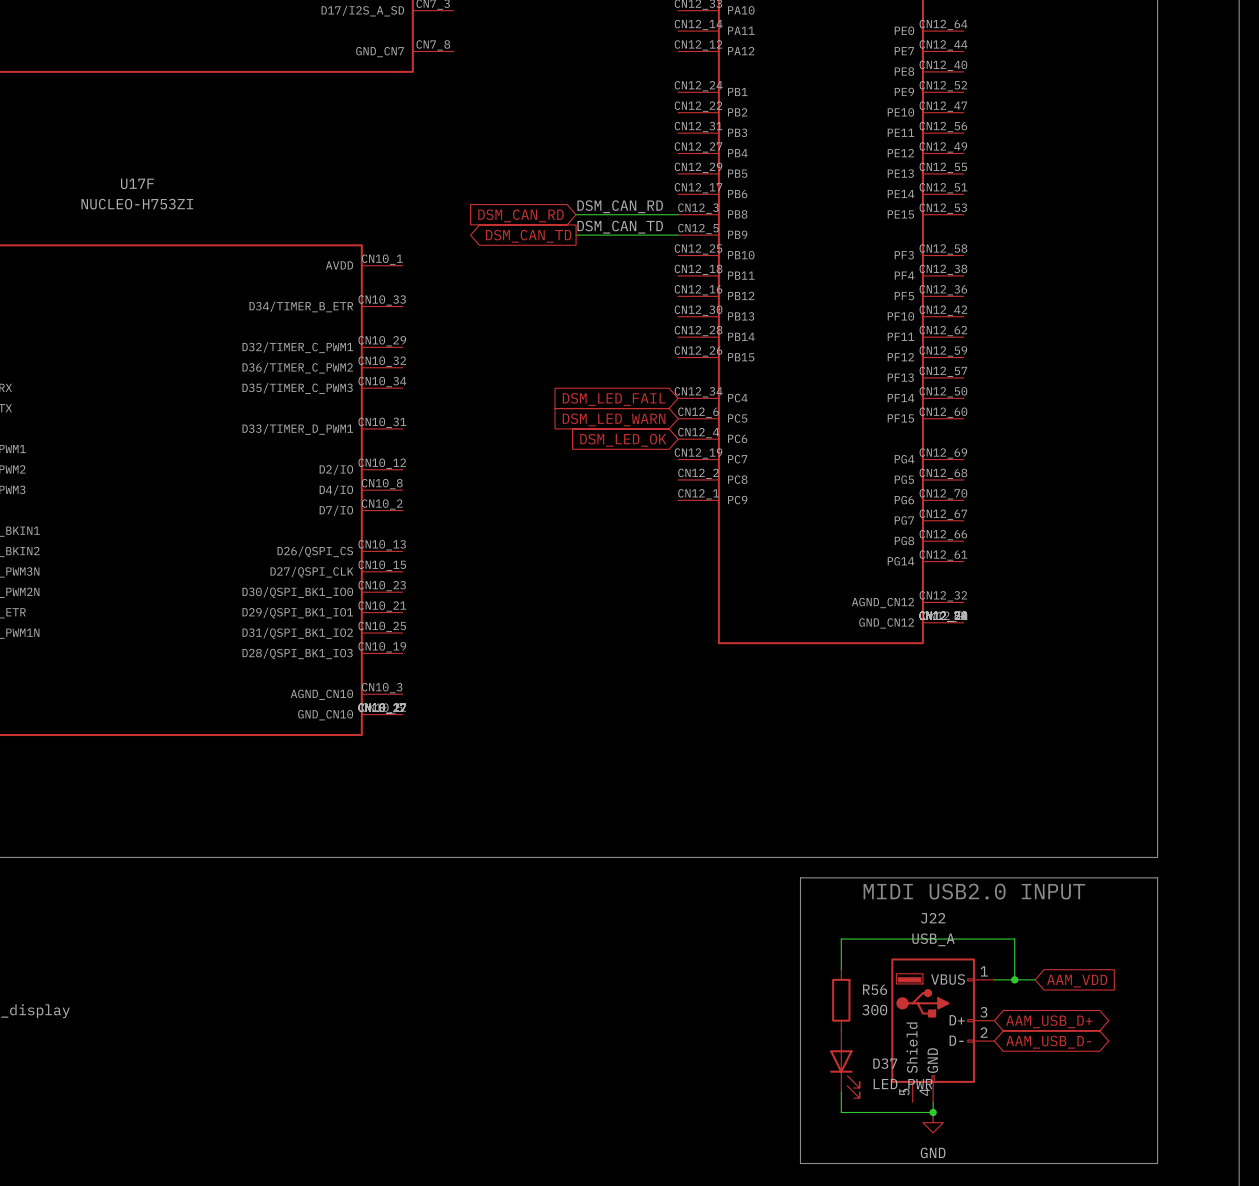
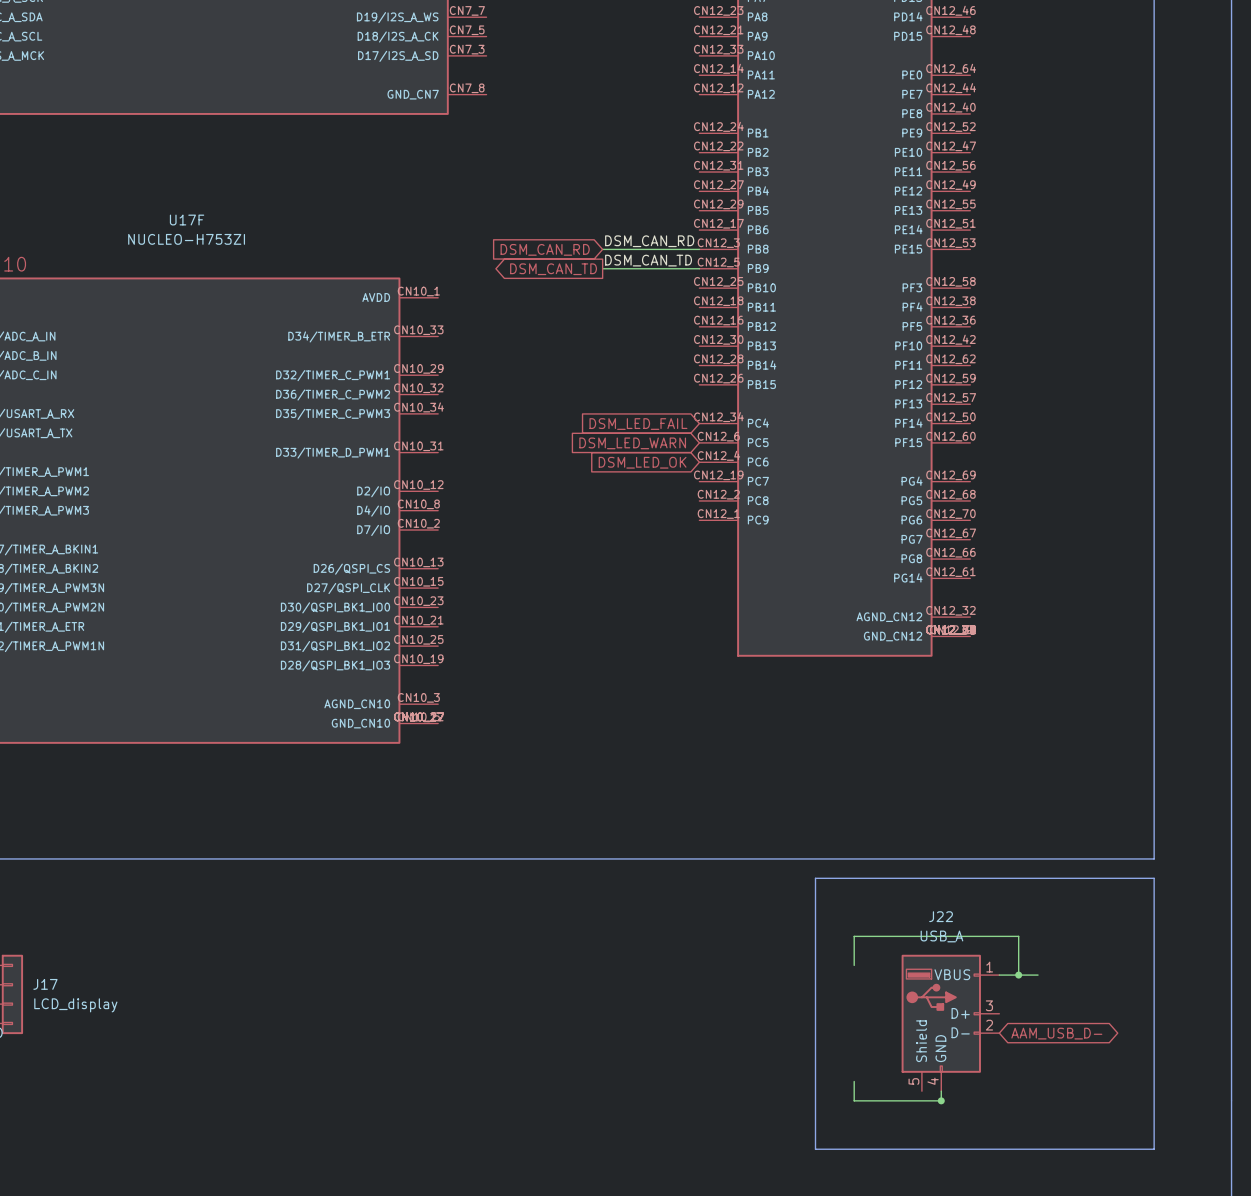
text: MIDI USB2.0 INPUT (974, 891) -> none
global label: AAM_VDD (1077, 981) -> none
R56: 300 (841, 1000) -> none
global label: AAM_USB_D+ (1049, 1021) -> none
D37: LED_PWR (844, 1064) -> none
power symbol: GND (933, 1122) -> none

